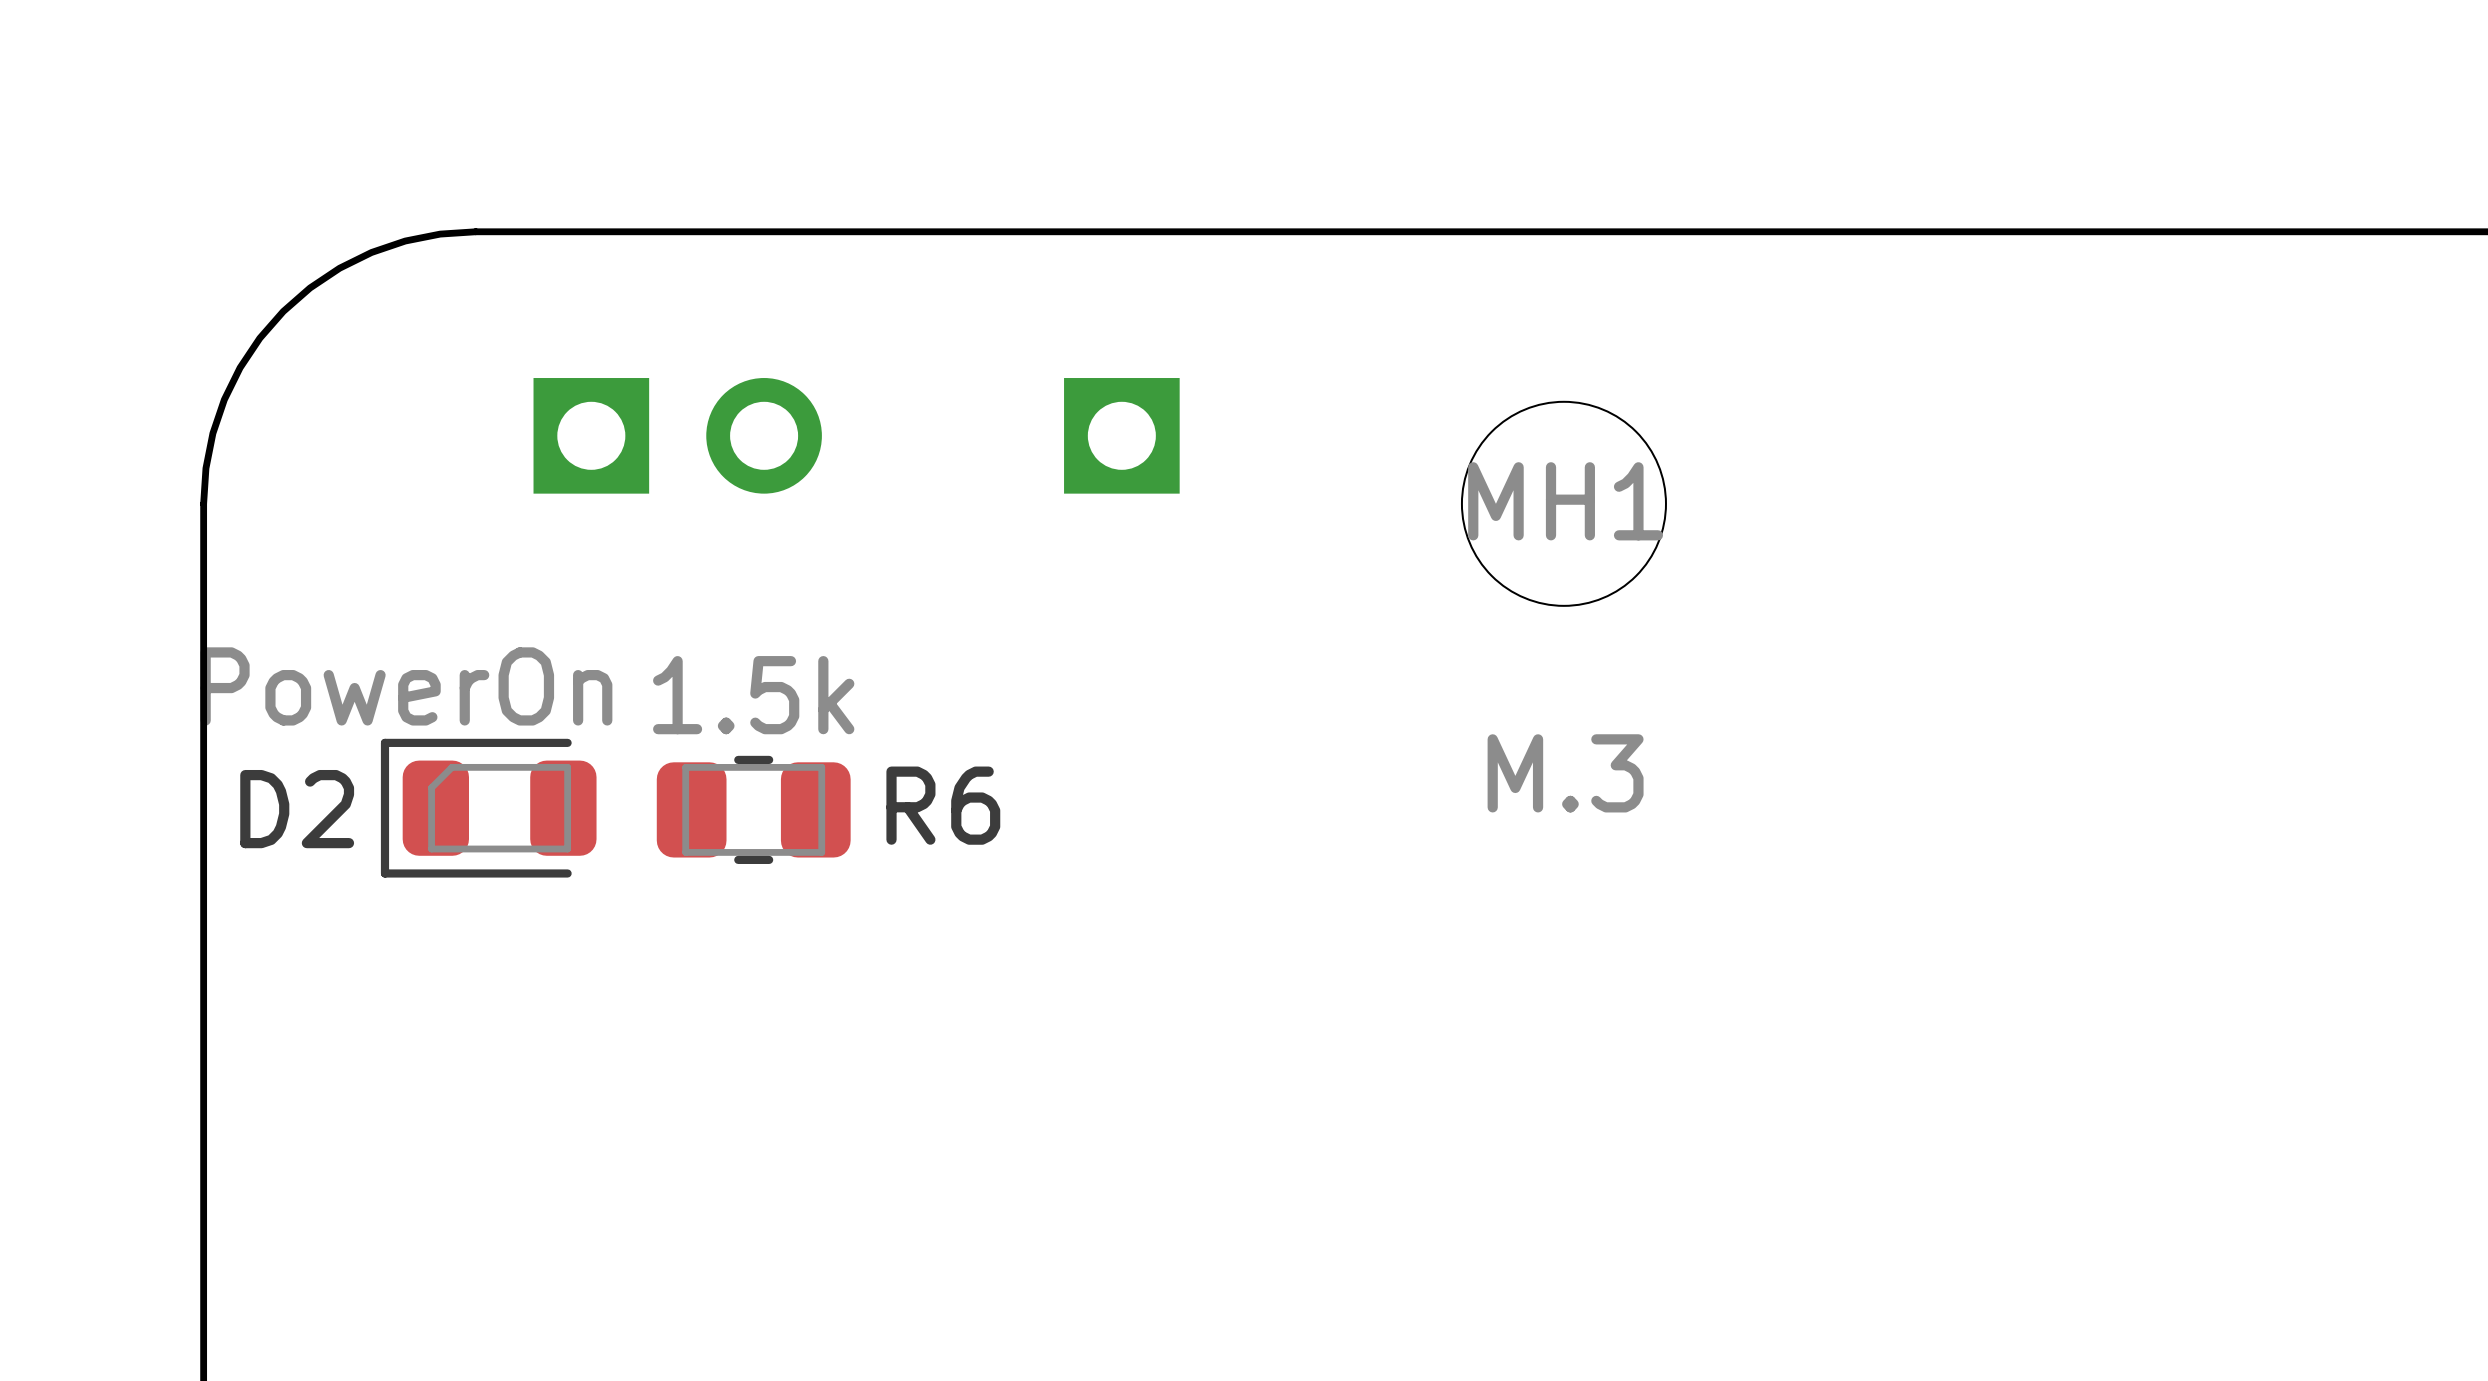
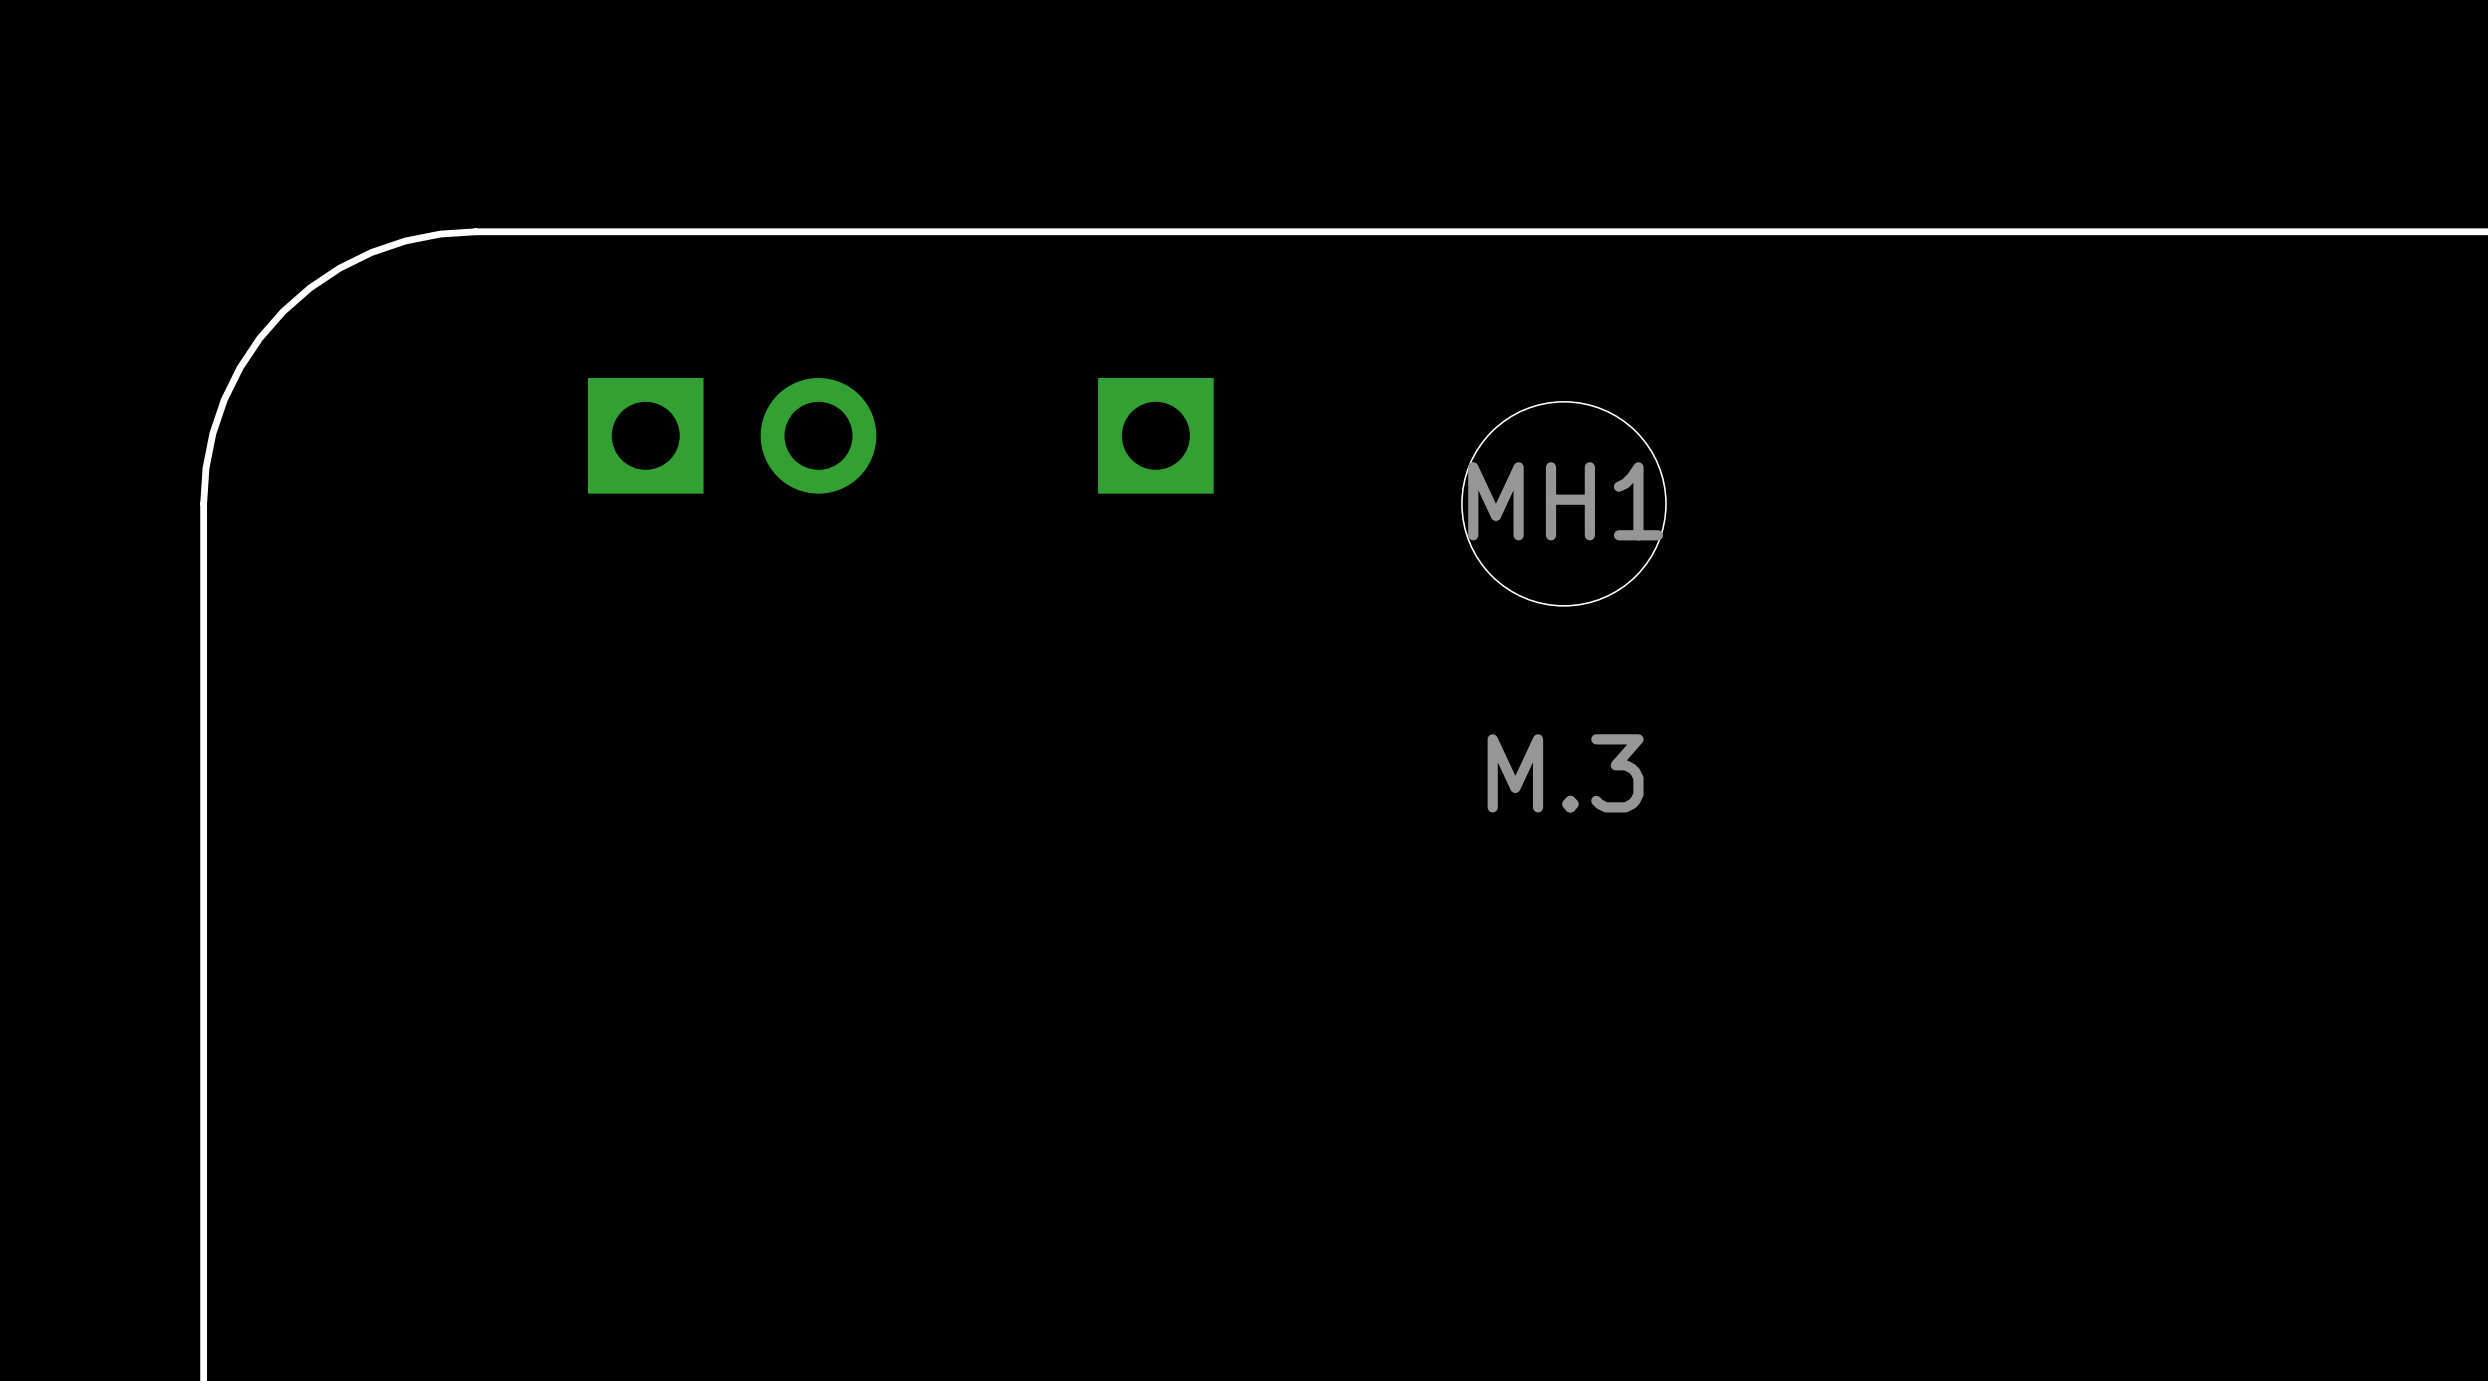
part position: (677, 435) -> (732, 435)
part position: (1121, 435) -> (1155, 435)
D2: PowerOn (488, 808) -> none
R6: 1.5k (753, 809) -> none

